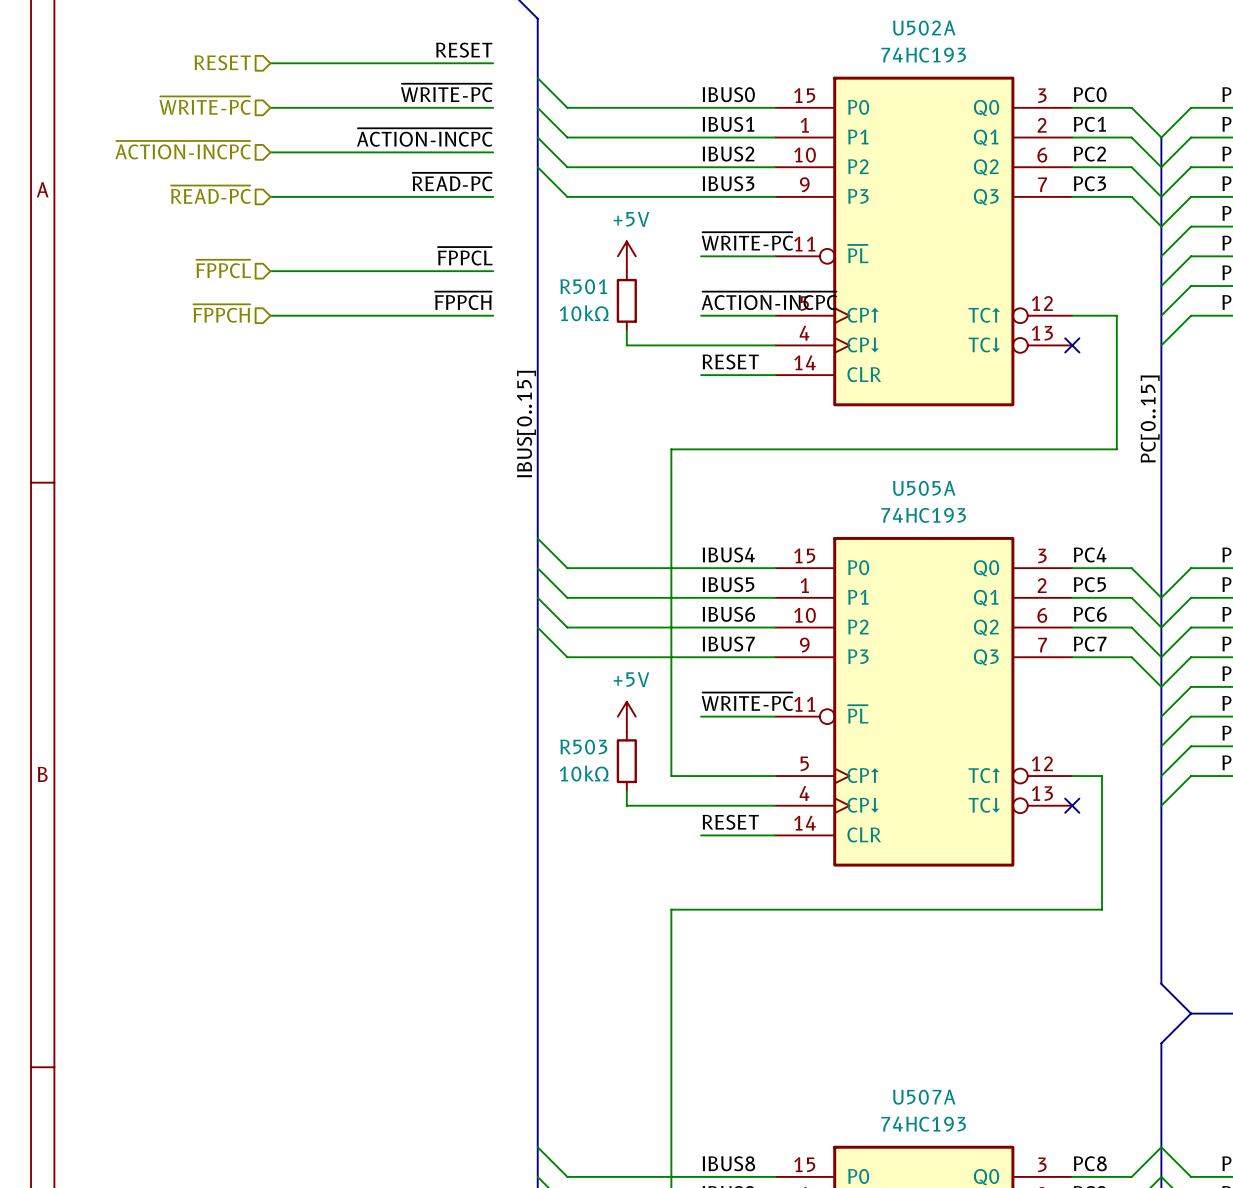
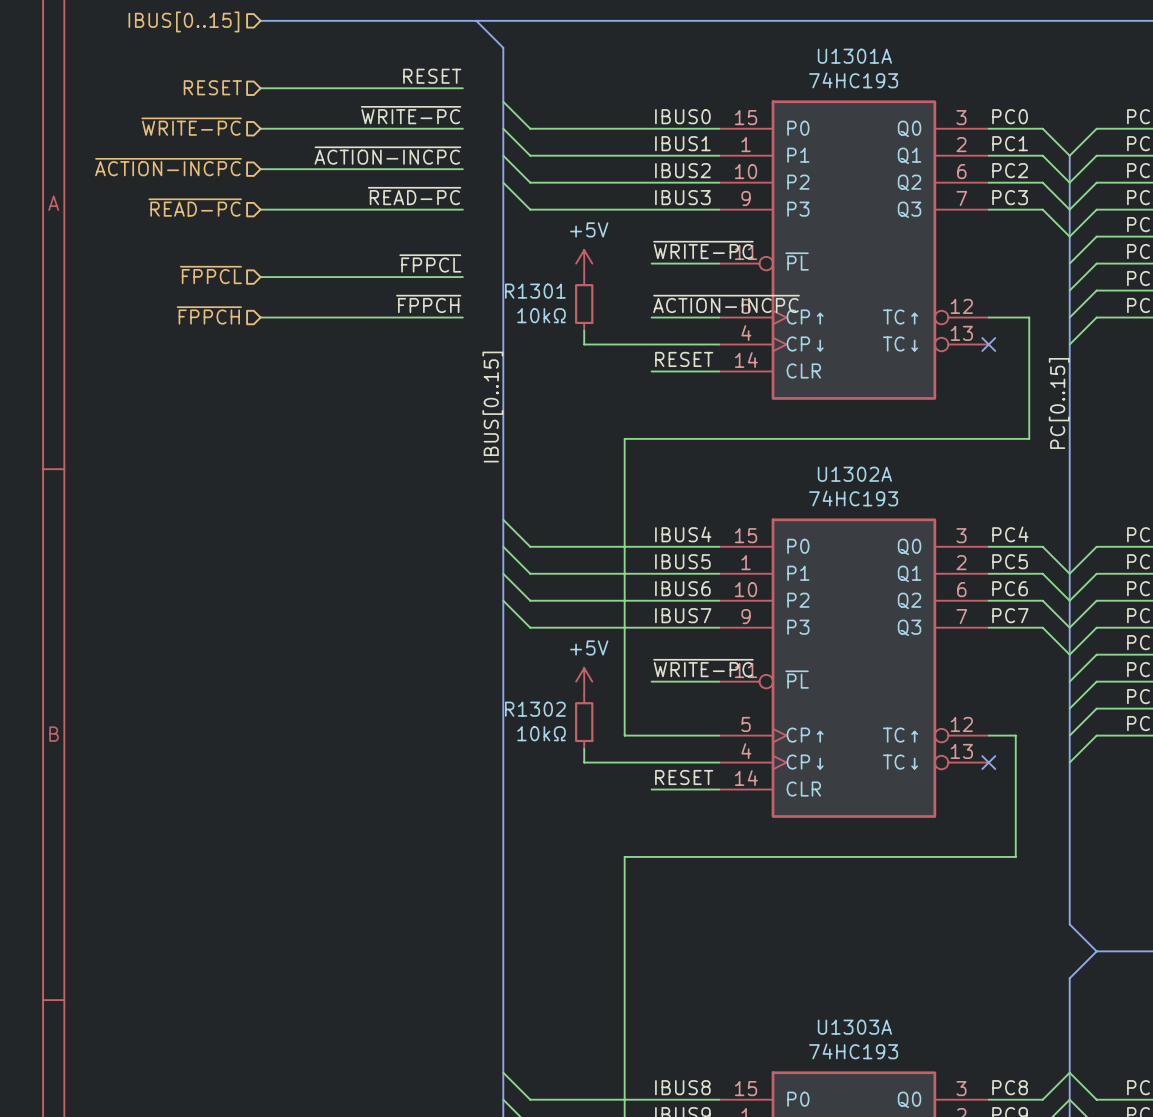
U502A name: U502A (924, 28) -> U1301A (854, 56)
R501 name: R501 (583, 286) -> R1301 (535, 291)
U505A name: U505A (924, 488) -> U1302A (854, 474)
R503 name: R503 (583, 747) -> R1302 (535, 709)
U507A name: U507A (924, 1097) -> U1303A (854, 1027)

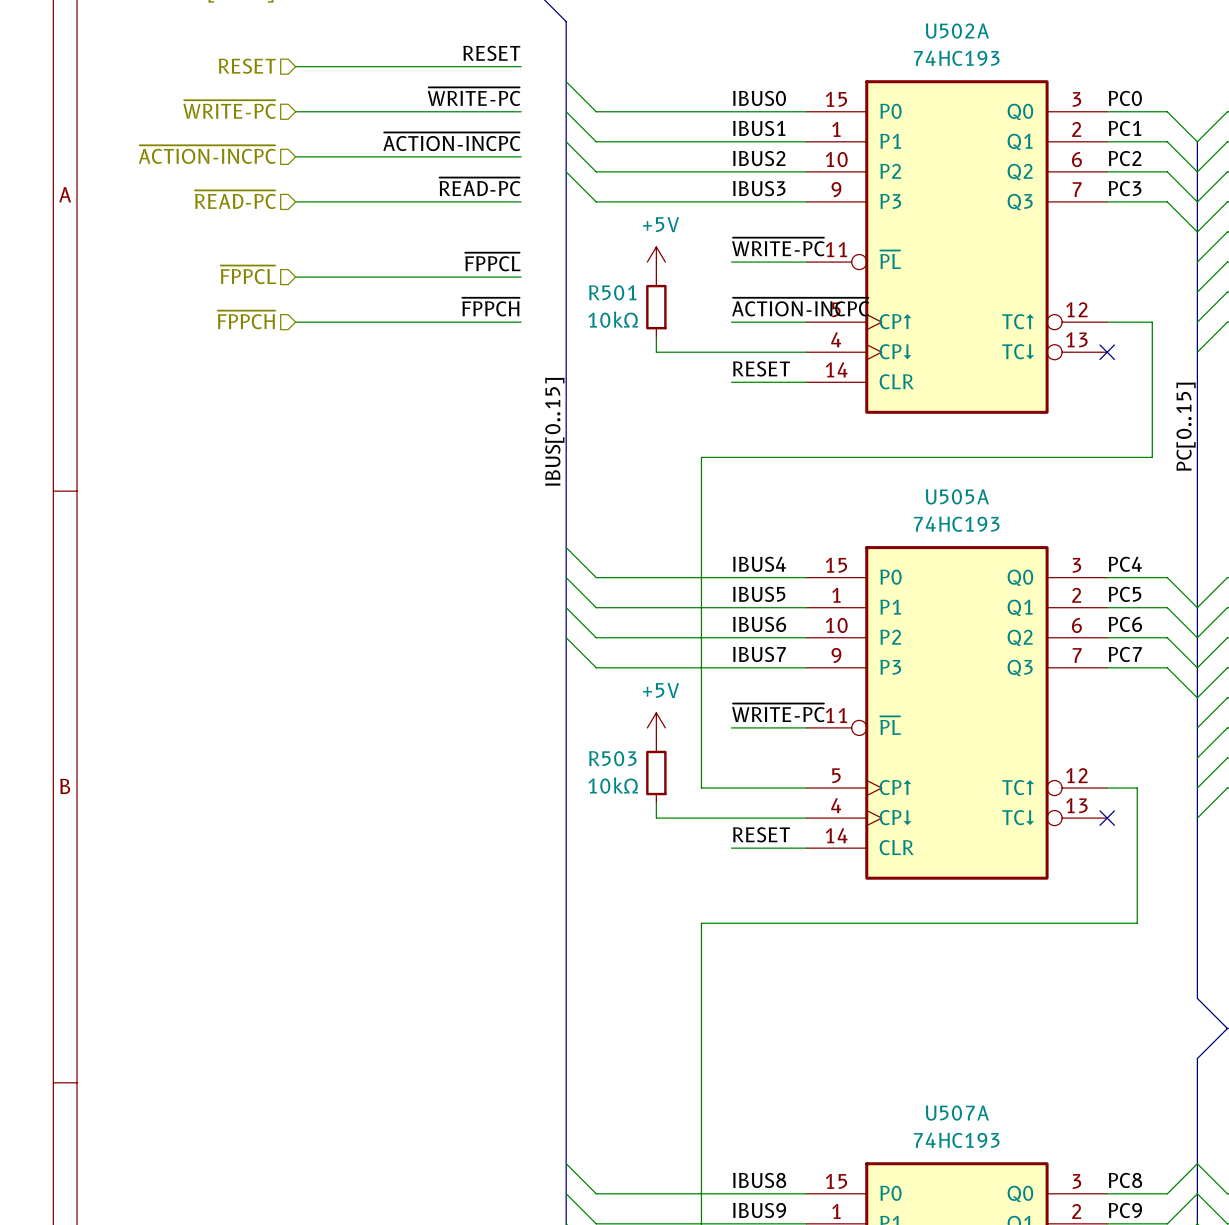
U1301A name: U1301A (854, 56) -> U502A (957, 31)
R1301 name: R1301 (535, 291) -> R501 (612, 292)
U1302A name: U1302A (854, 474) -> U505A (957, 496)
R1302 name: R1302 (535, 709) -> R503 (612, 758)
U1303A name: U1303A (854, 1027) -> U507A (957, 1113)

